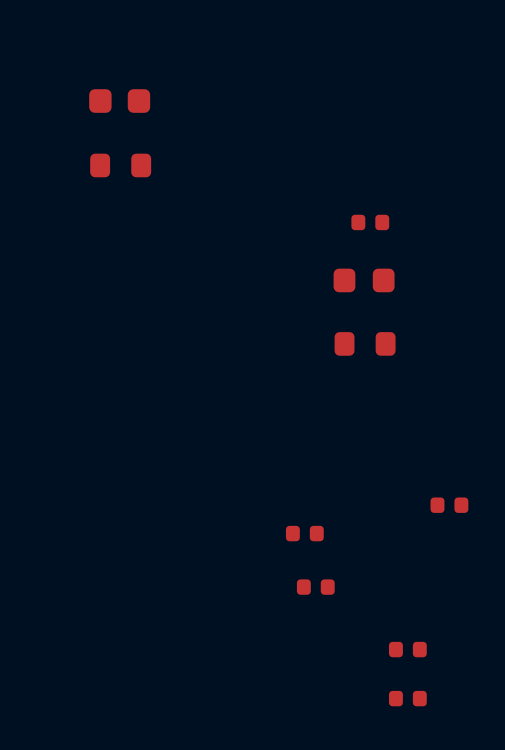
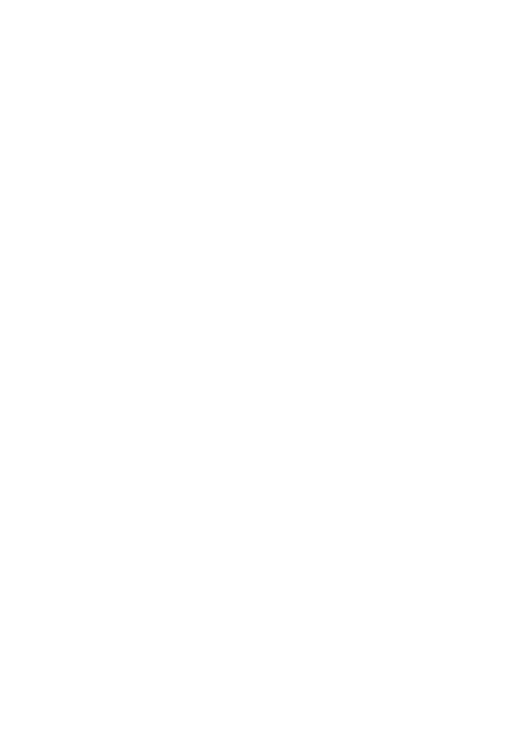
part: (119, 101) -> none
part: (120, 165) -> none
part: (370, 222) -> none
part: (364, 280) -> none
part: (365, 343) -> none
part: (449, 505) -> none
part: (304, 533) -> none
part: (315, 587) -> none
part: (407, 649) -> none
part: (407, 698) -> none

